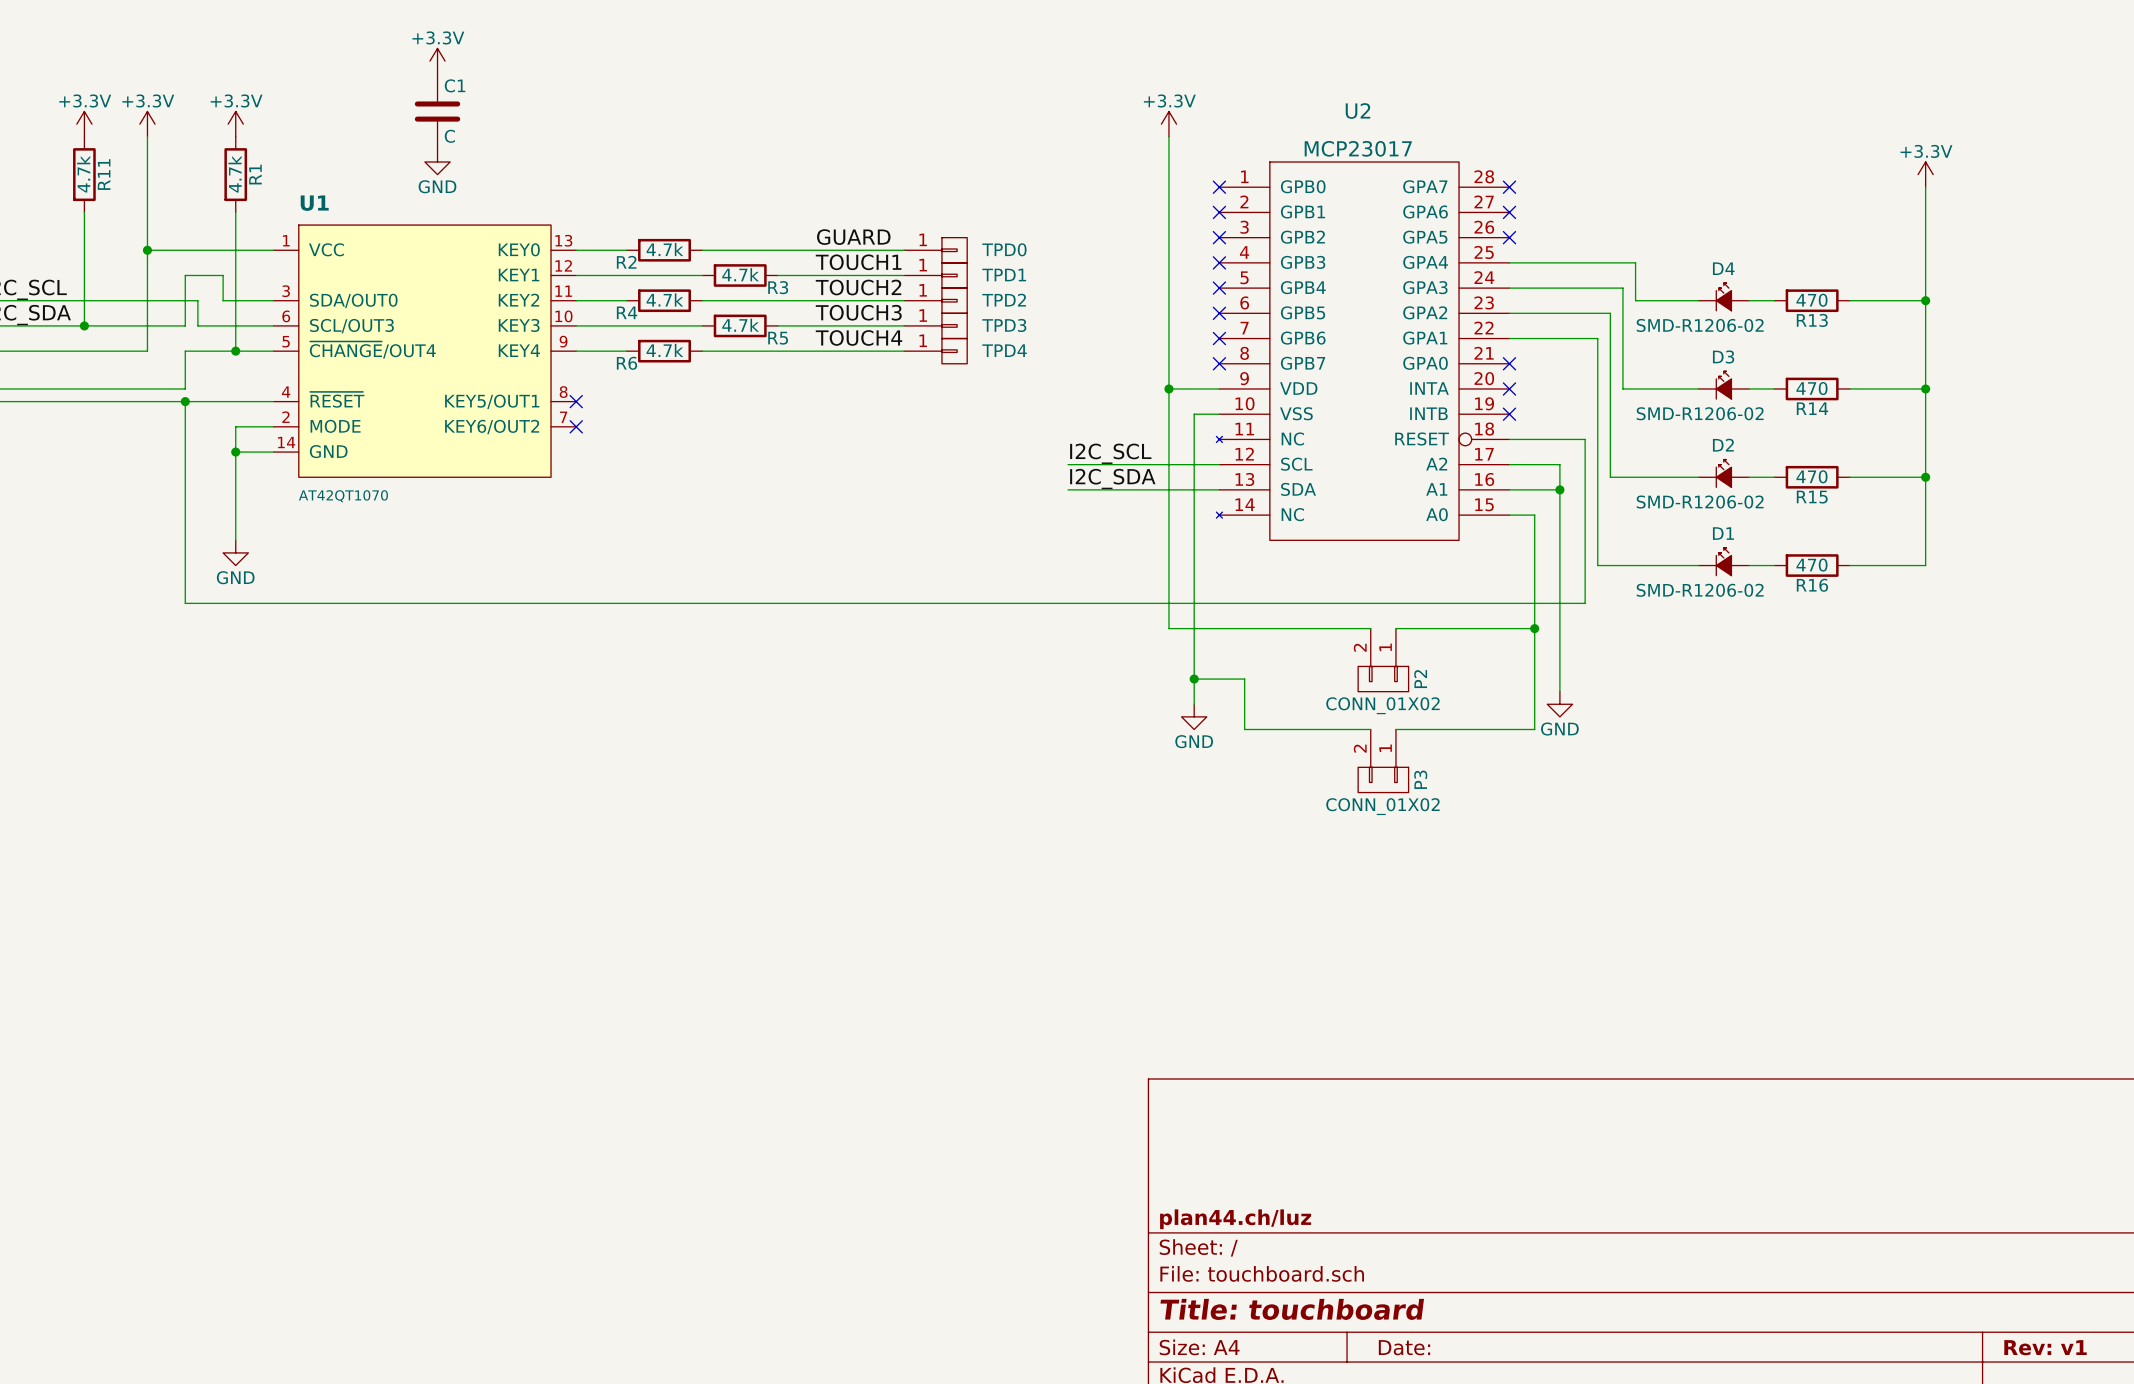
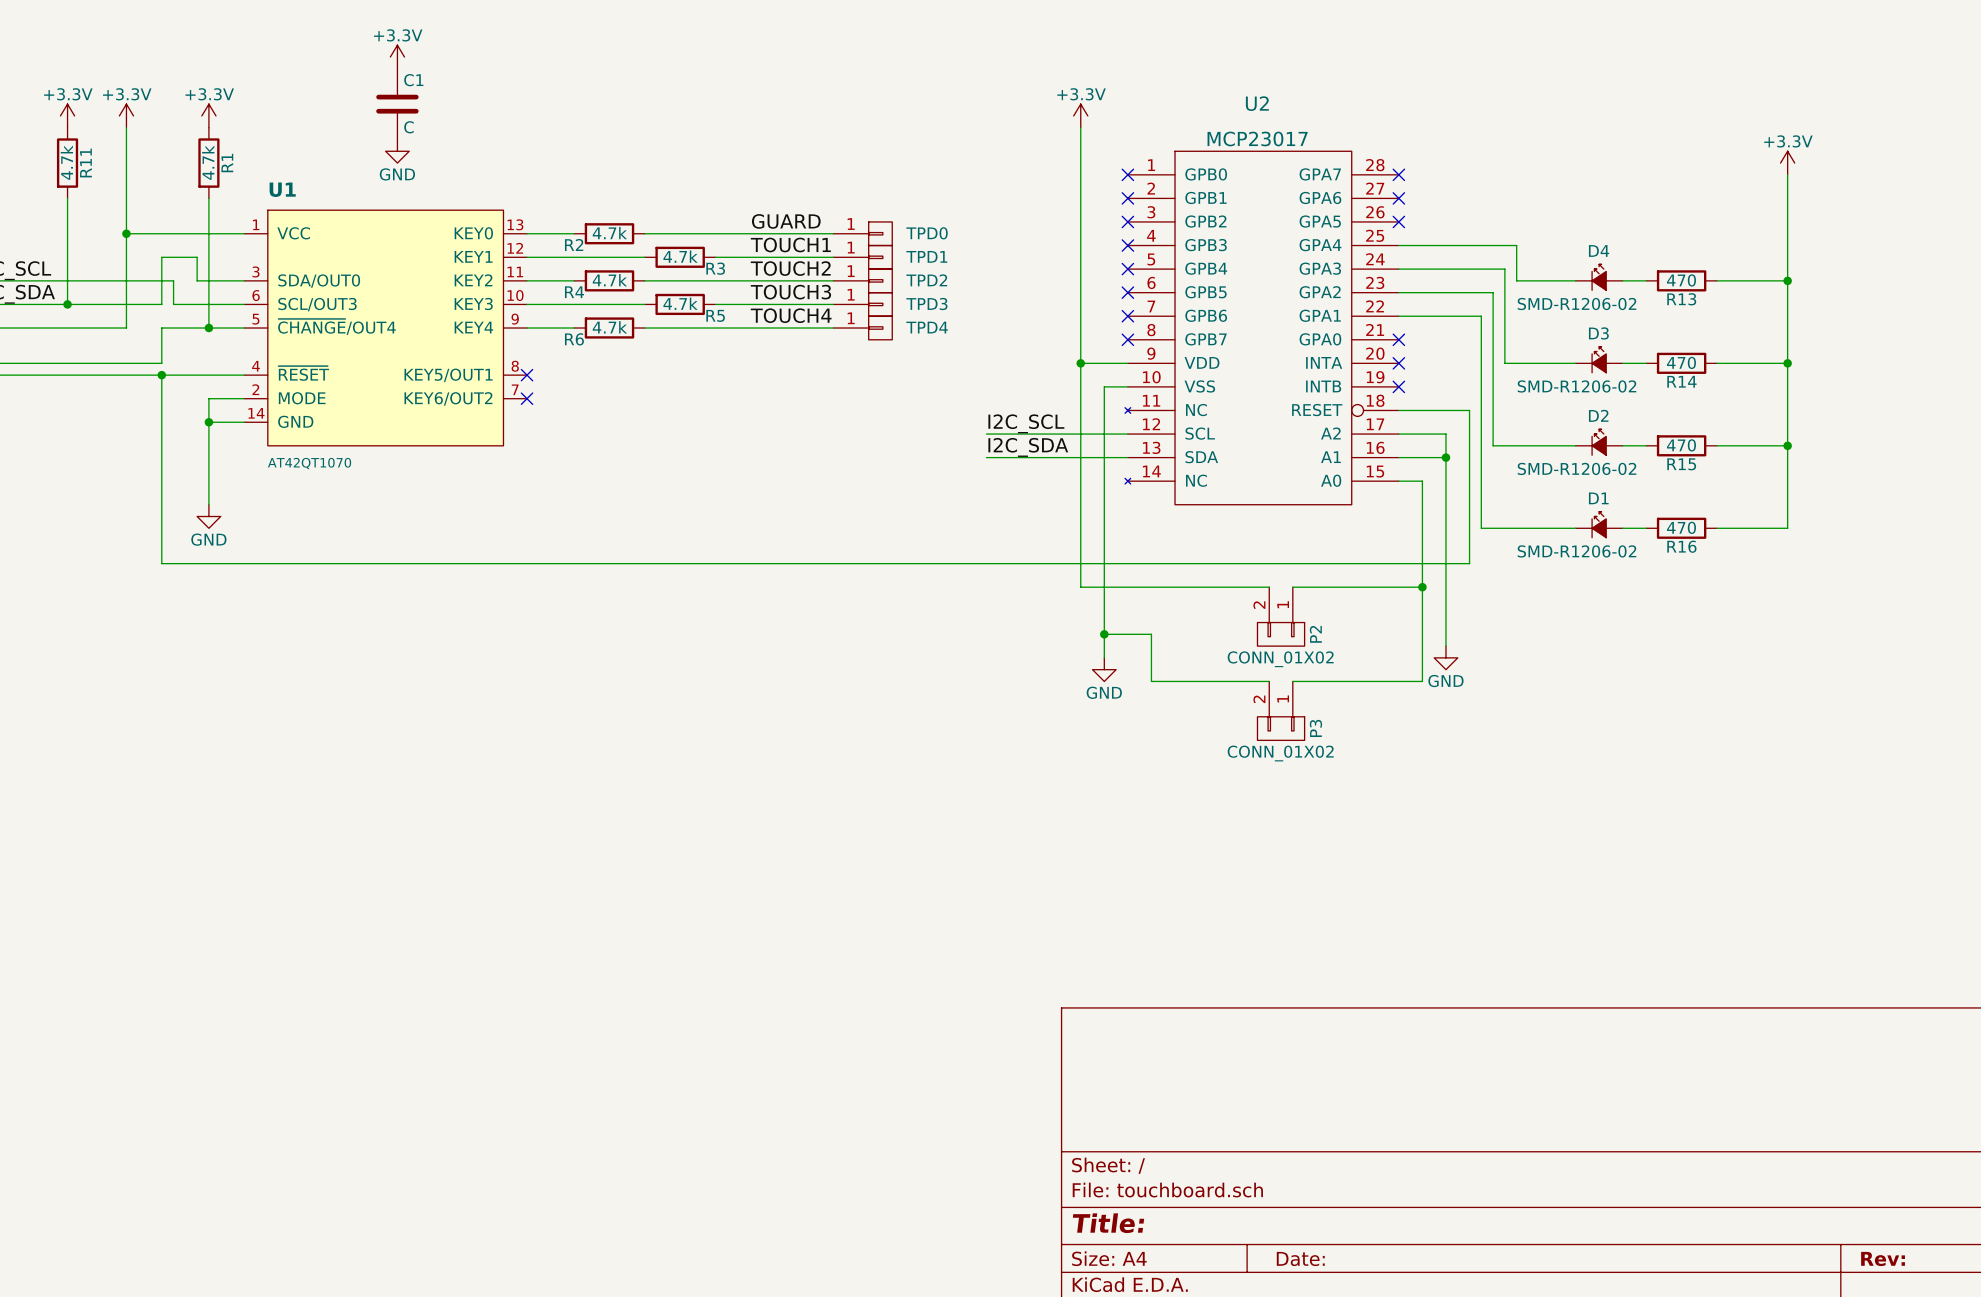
title block: plan44.ch/luz (1235, 1219) -> none
title block: Title: touchboard (1292, 1309) -> Title: (1108, 1223)
title block: Rev: v1 (2045, 1347) -> Rev: (1883, 1258)

